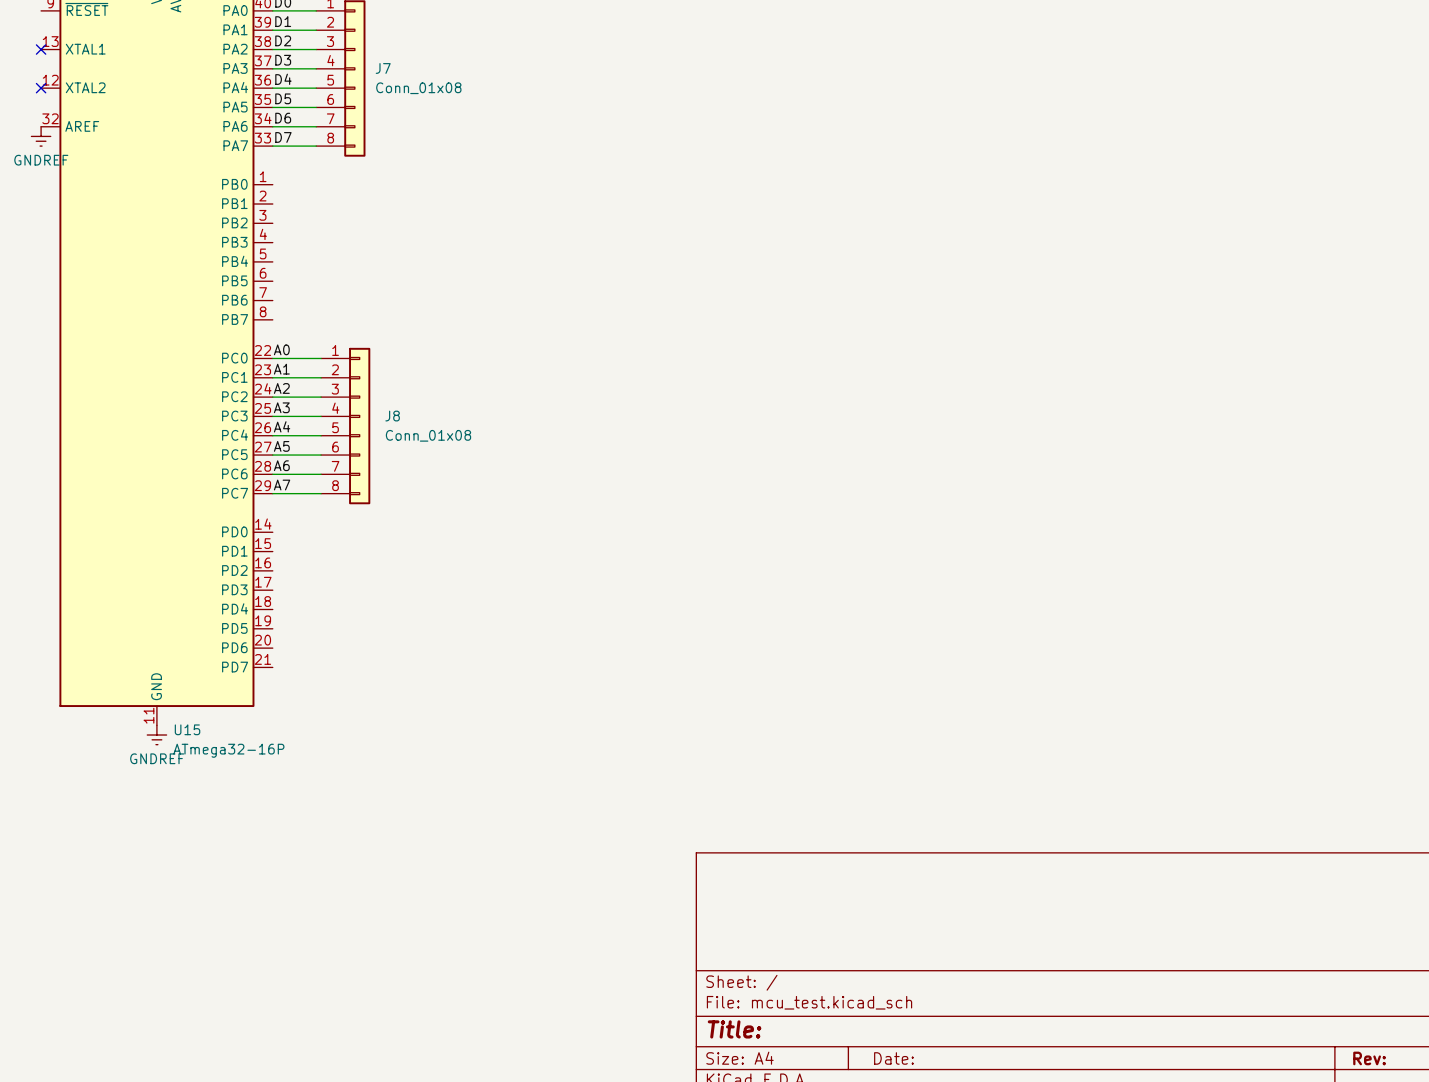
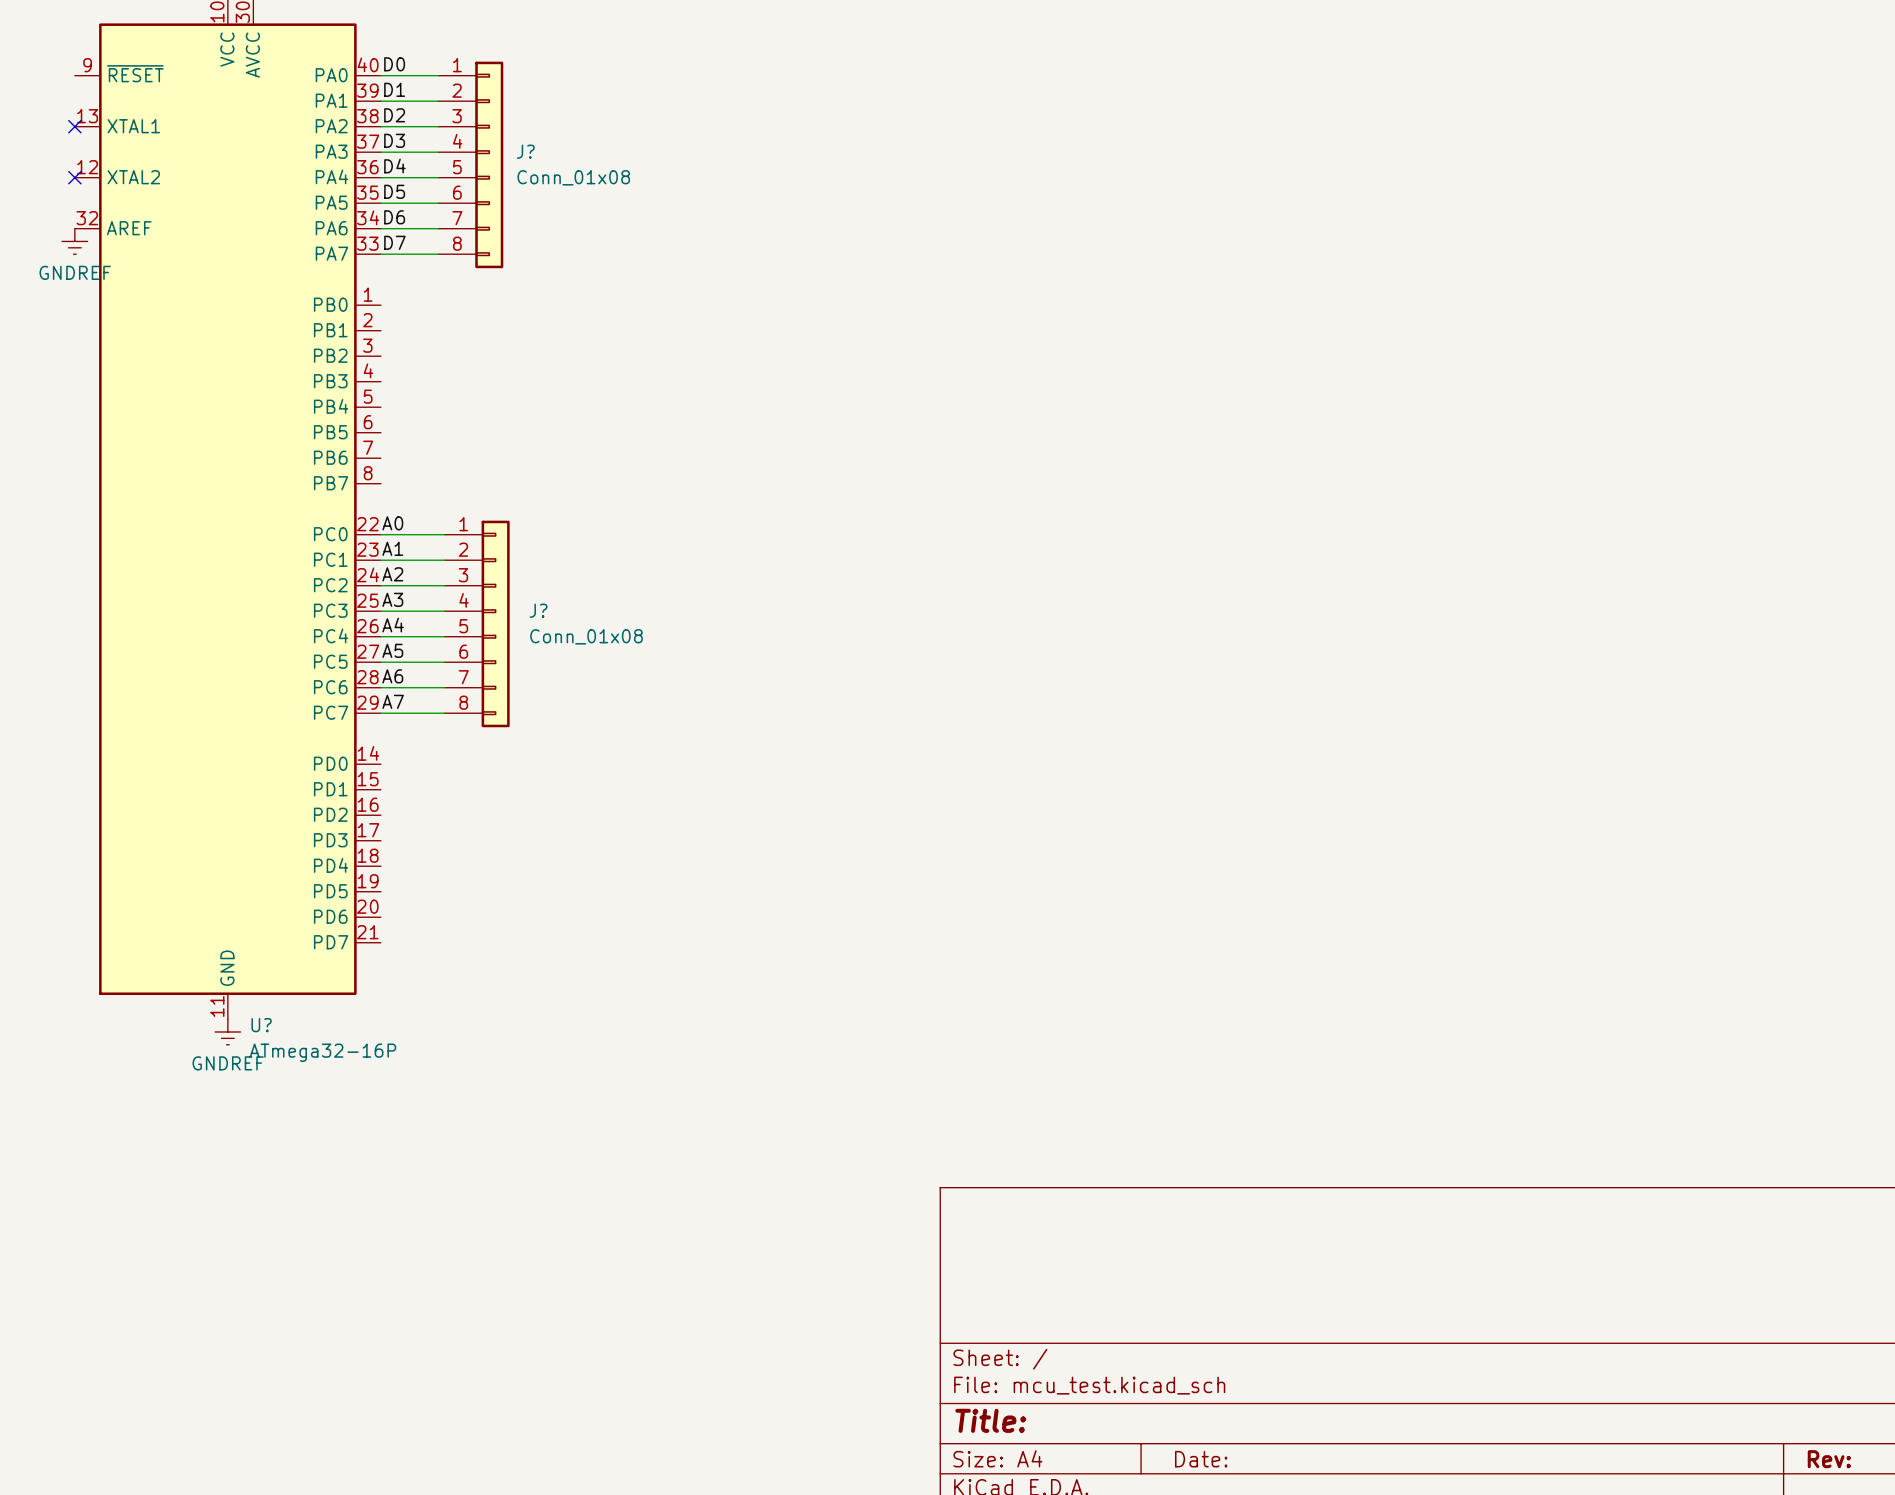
J7 name: J7 (383, 68) -> J? (525, 151)
J8 name: J8 (392, 416) -> J? (538, 610)
U15 name: U15 (187, 729) -> U? (261, 1025)

